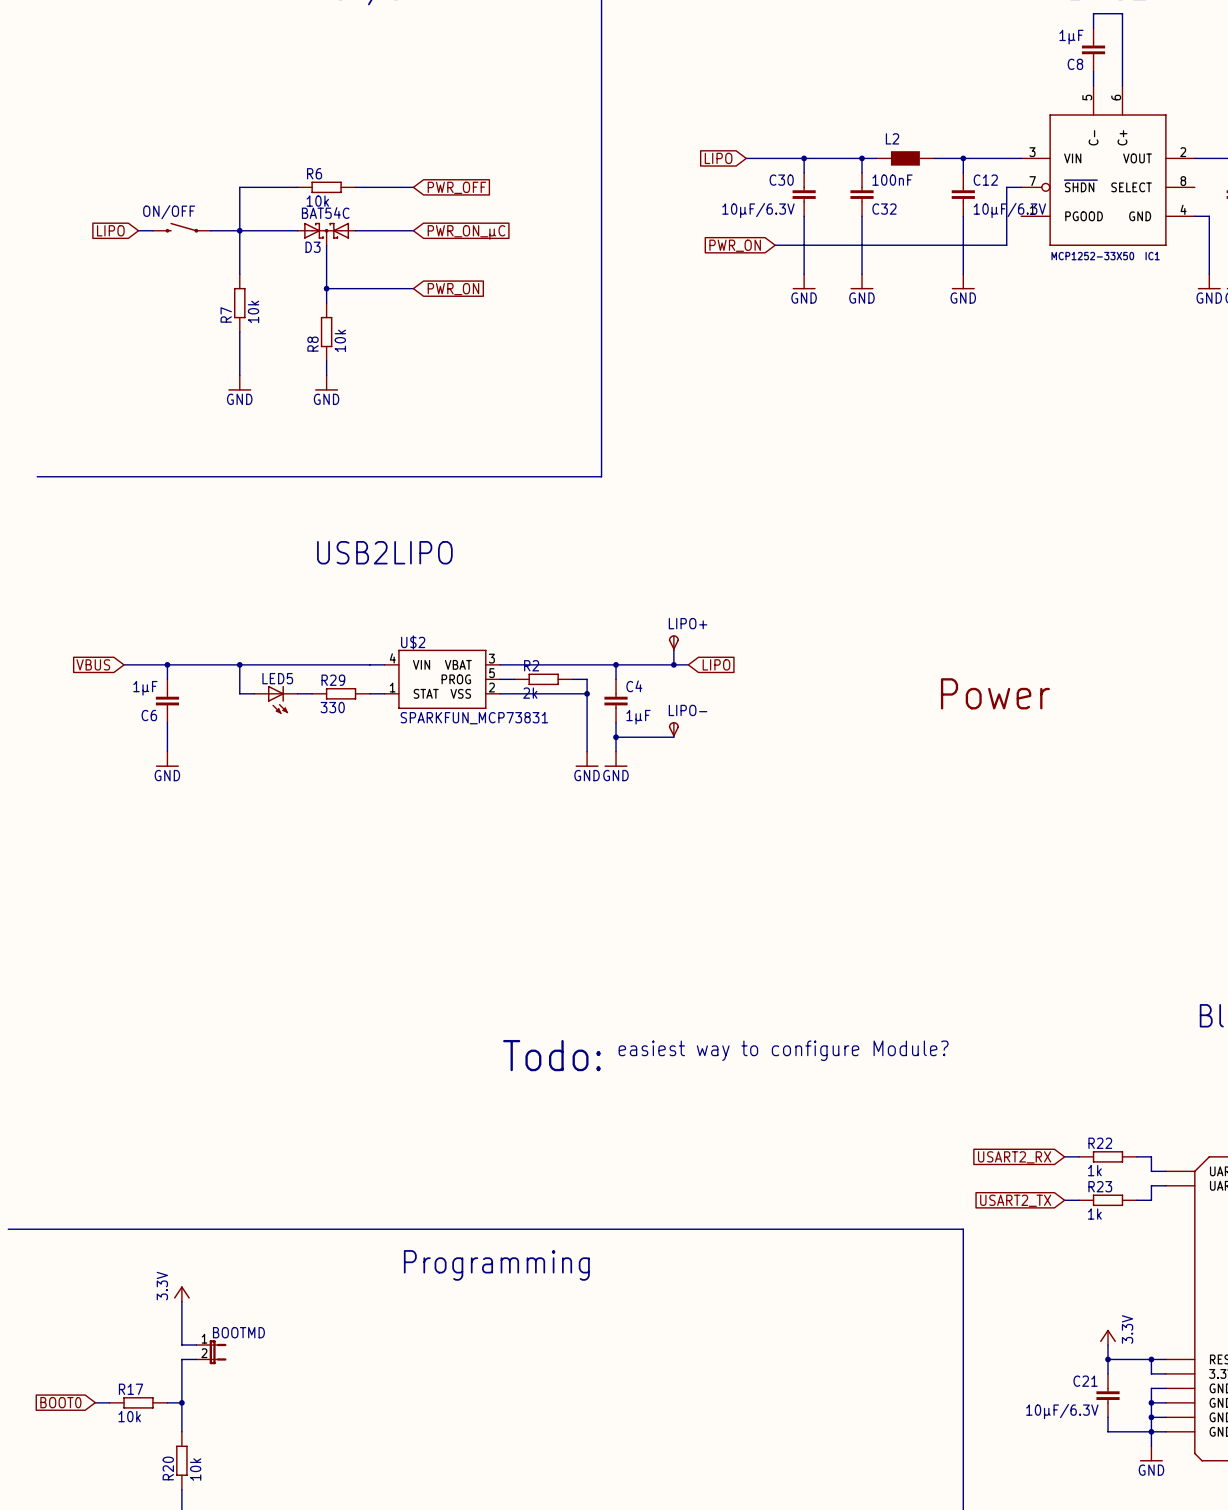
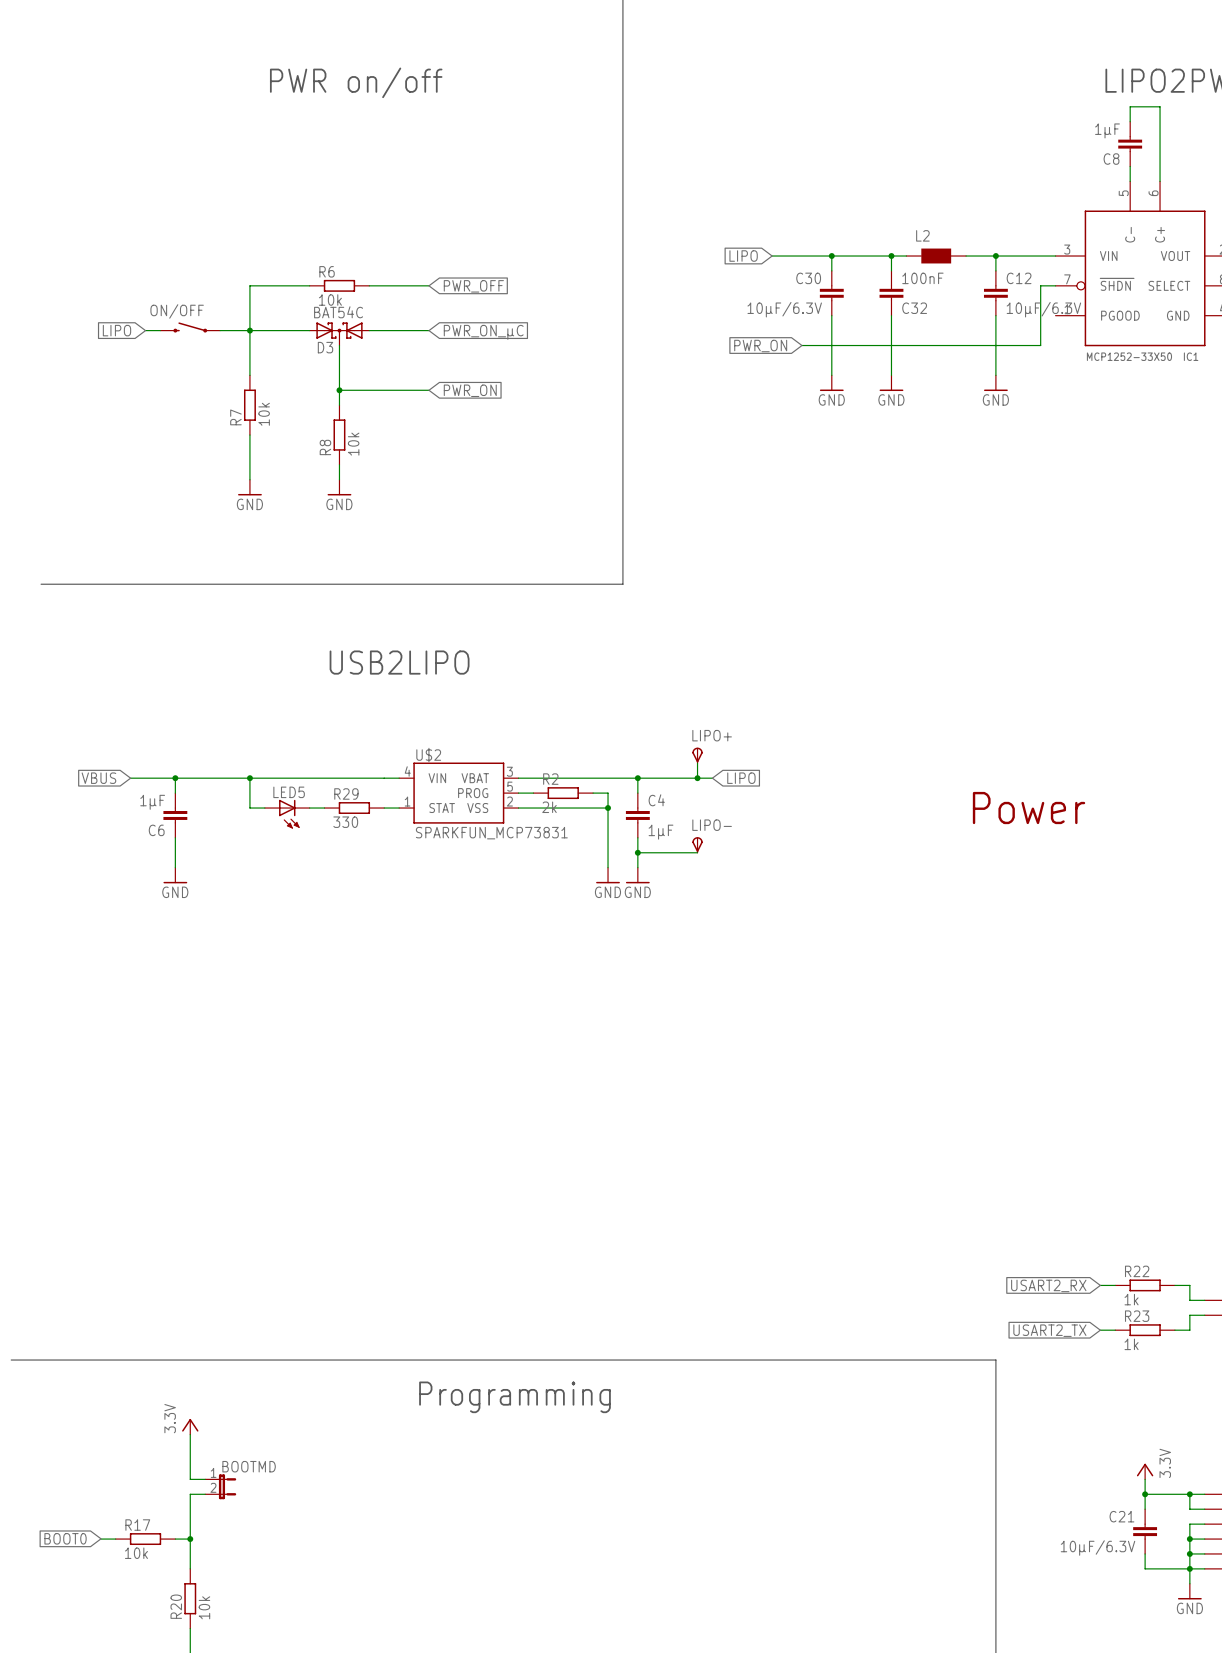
text: easiest way to configure Module? (783, 1050) -> none
text: Todo: (552, 1055) -> none

